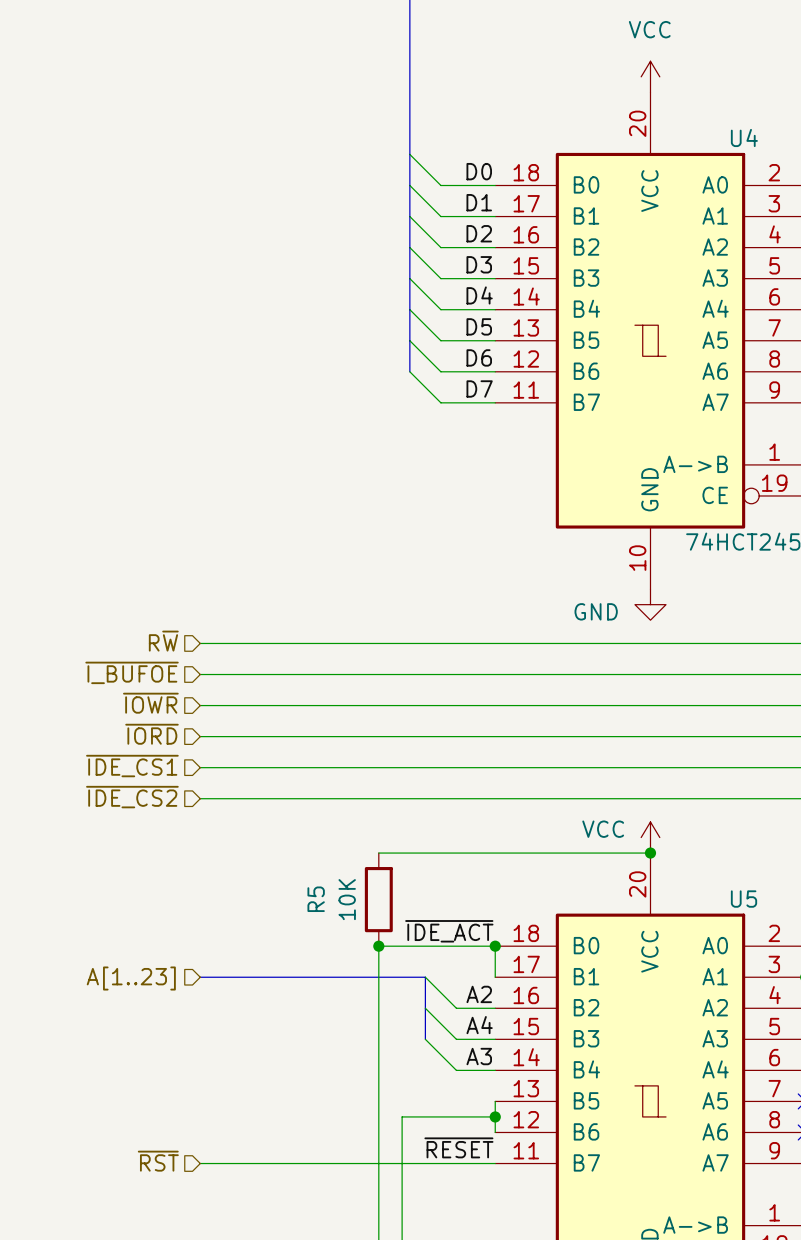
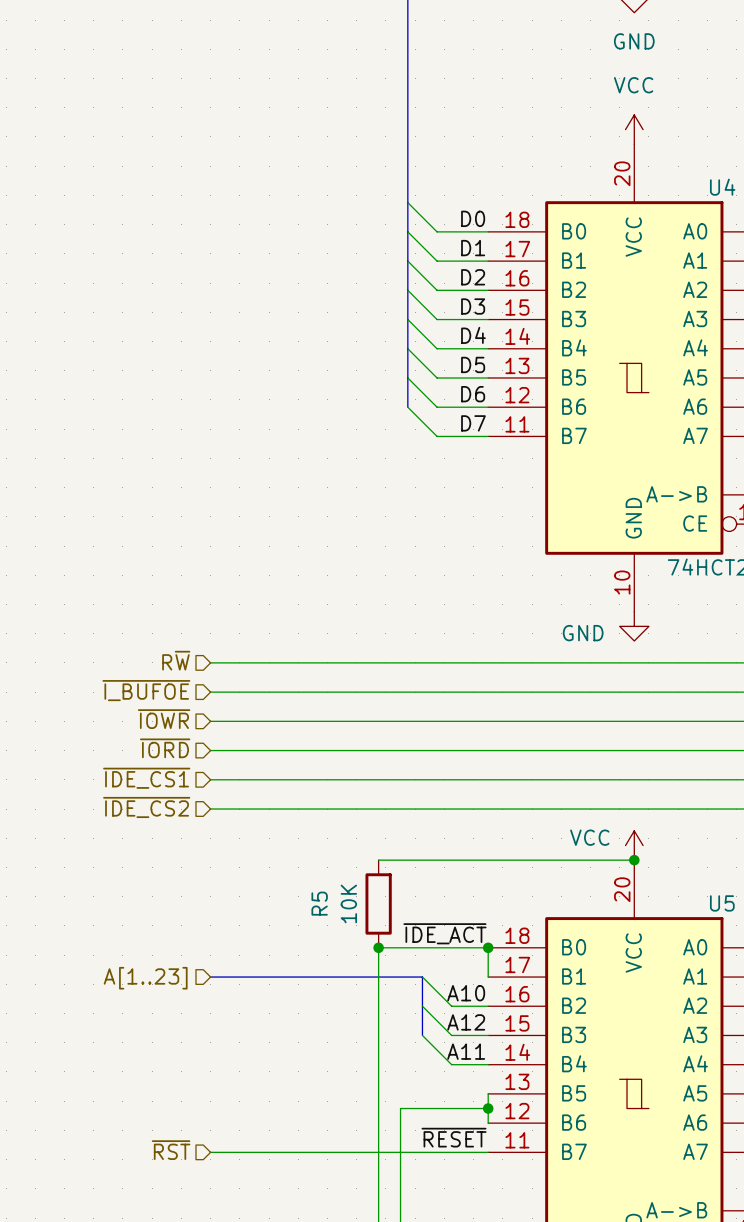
label: A2 (479, 994) -> A10 (466, 993)
label: A4 (479, 1025) -> A12 (466, 1022)
label: A3 (479, 1056) -> A11 (466, 1051)

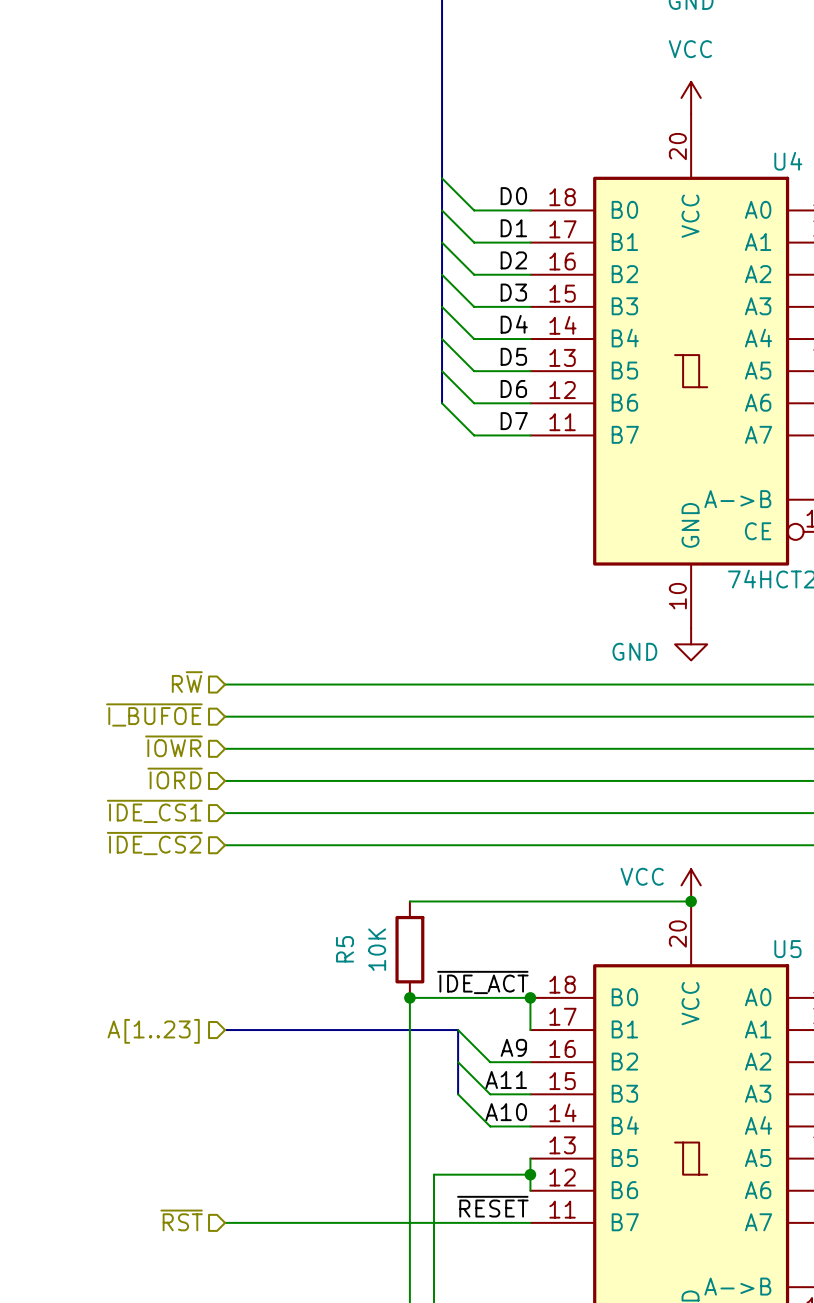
label: A10 (466, 993) -> A9 (513, 1047)
label: A12 (466, 1022) -> A11 (506, 1079)
label: A11 (466, 1051) -> A10 (506, 1112)

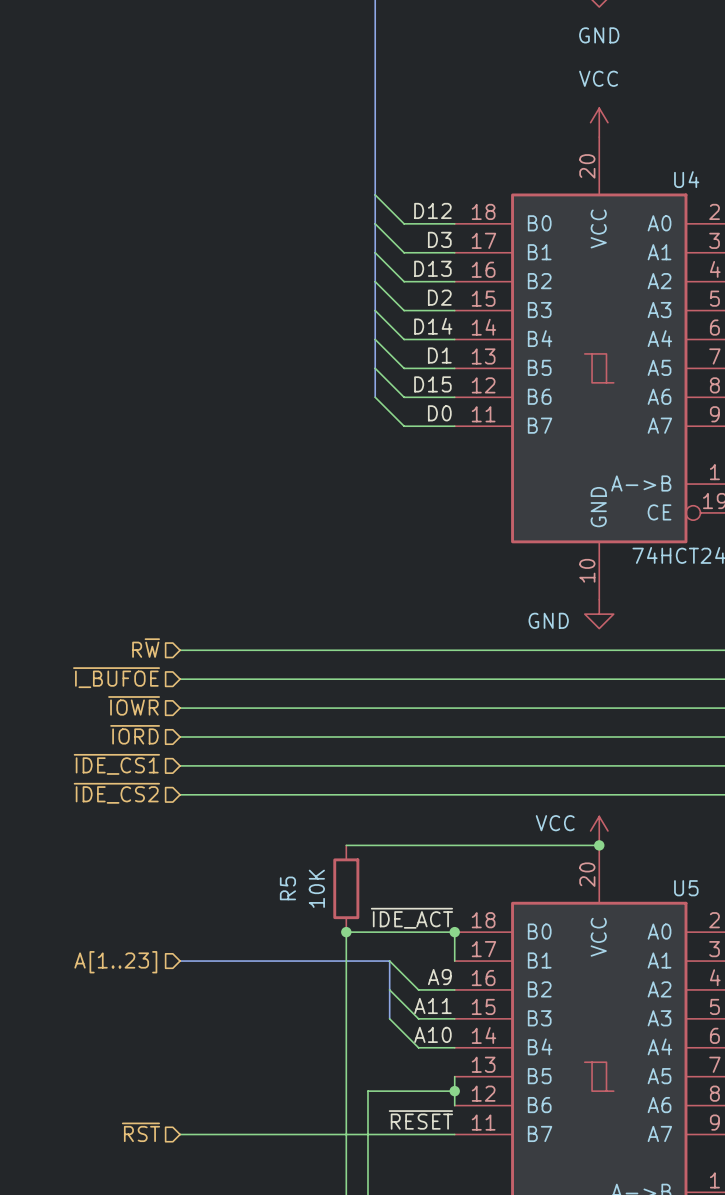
label: D0 (513, 196) -> D12 (432, 210)
label: D1 (513, 228) -> D3 (439, 239)
label: D2 (513, 260) -> D13 (432, 268)
label: D3 (513, 292) -> D2 (439, 297)
label: D4 (514, 324) -> D14 (433, 326)
label: D5 (513, 356) -> D1 (439, 355)
label: D6 (513, 388) -> D15 (432, 384)
label: D7 (514, 421) -> D0 (439, 413)

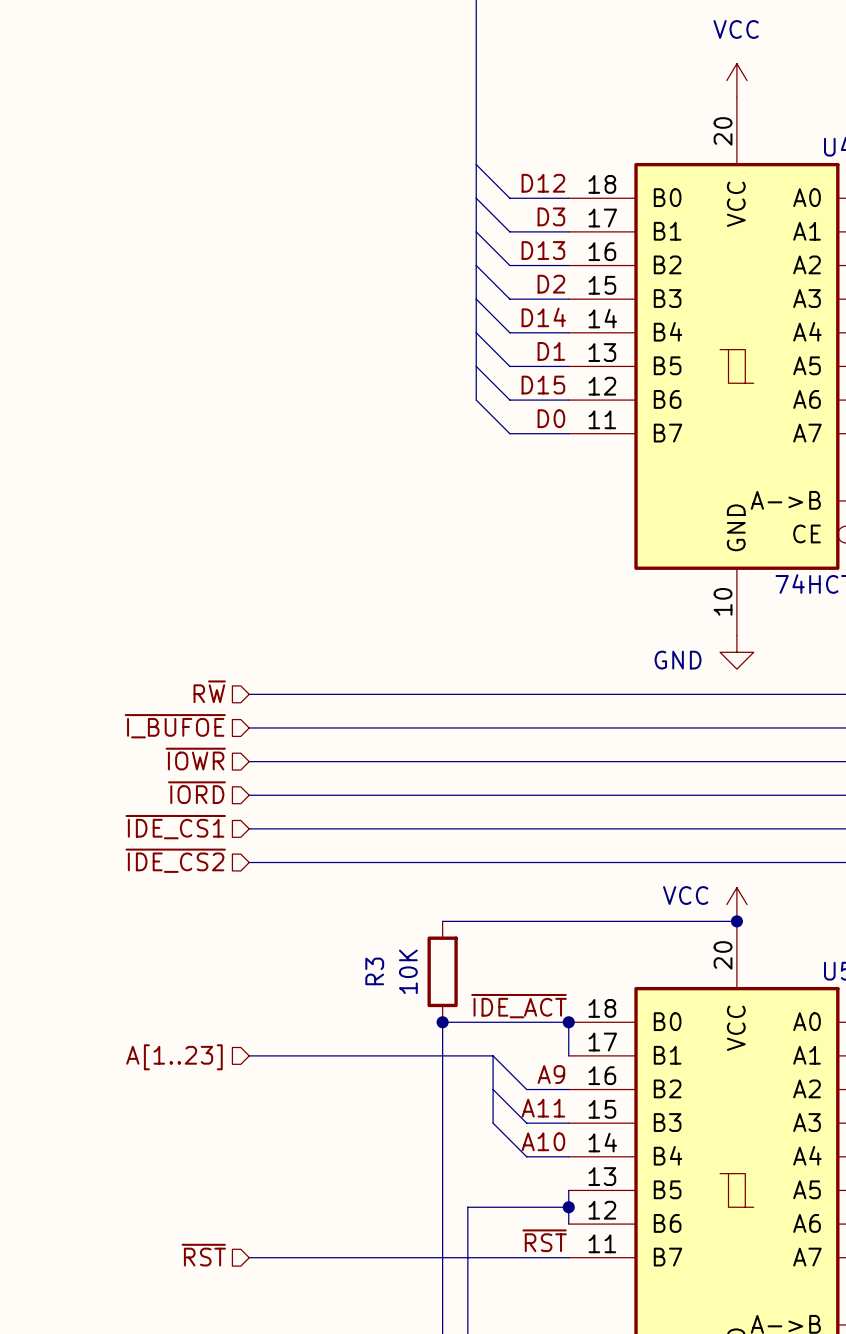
R5 name: R5 (287, 888) -> R3 (374, 971)
label: ~{RESET} (420, 1119) -> ~{RST} (544, 1240)

